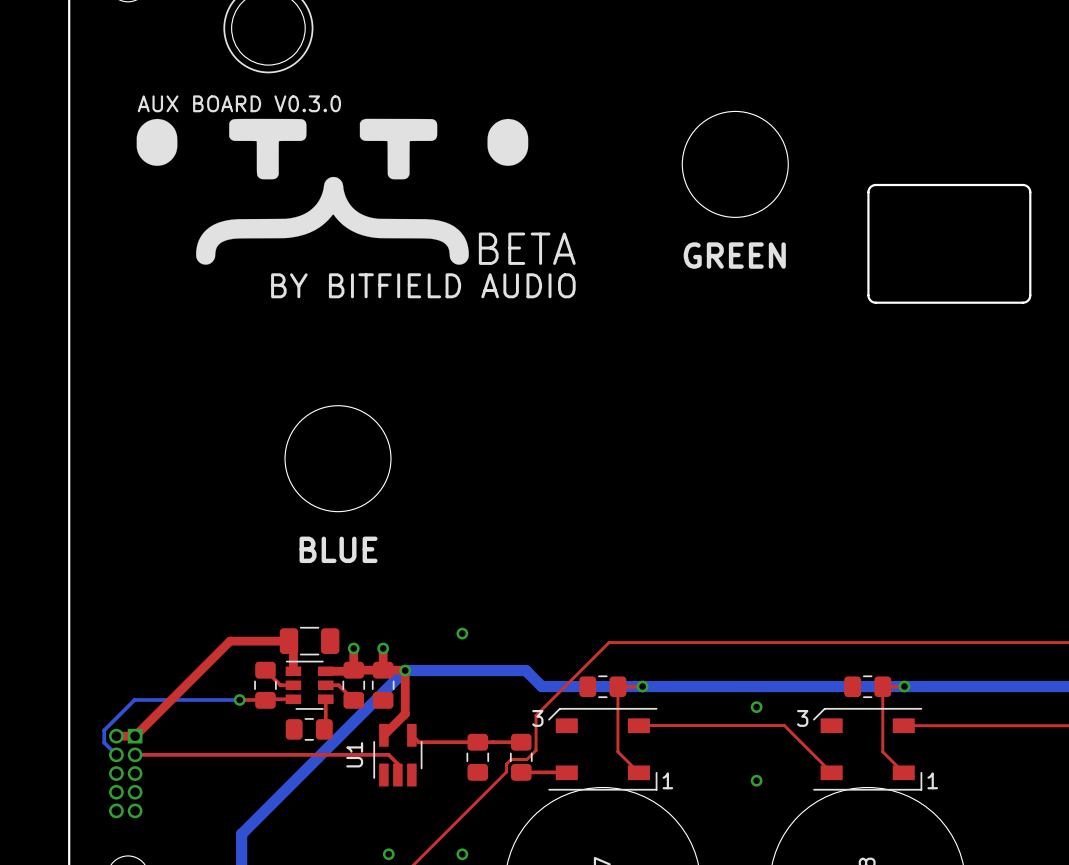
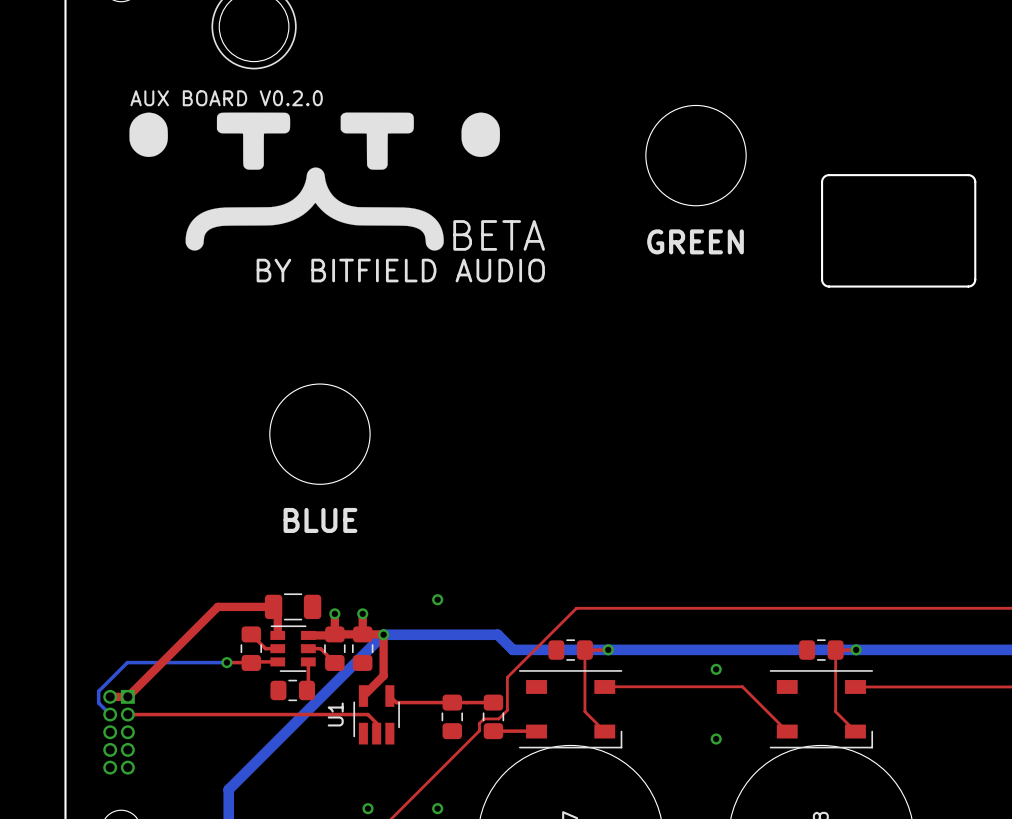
text: AUX BOARD V0.3.0 (239, 103) -> AUX BOARD V0.2.0 (226, 98)
part footprint: [548, 707, 658, 791] -> [518, 670, 623, 749]
part footprint: [813, 707, 923, 791] -> [769, 670, 874, 749]

